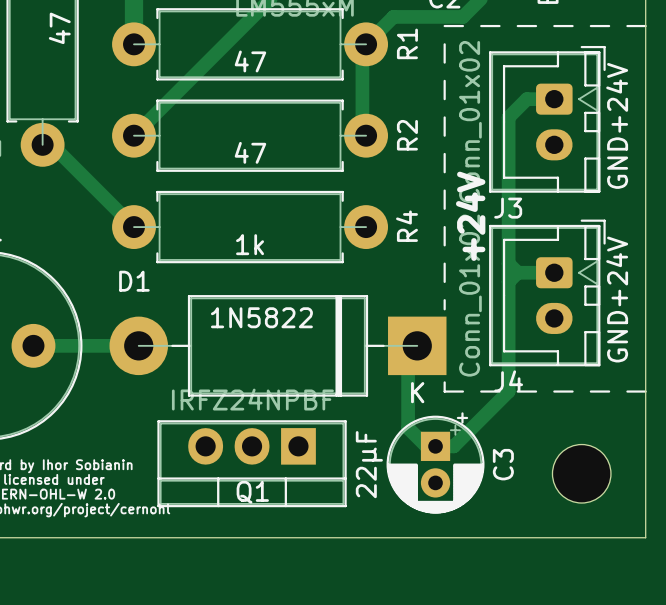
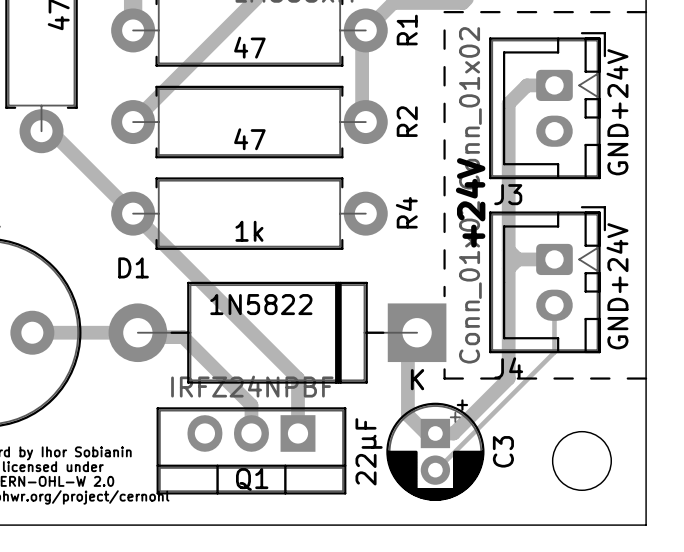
track: none -> (133, 213) (298, 378) (298, 433)
track: none -> (554, 305) (554, 352) (435, 470)
track: none -> (137, 332) (142, 337) (183, 337) (251, 405) (251, 438)

